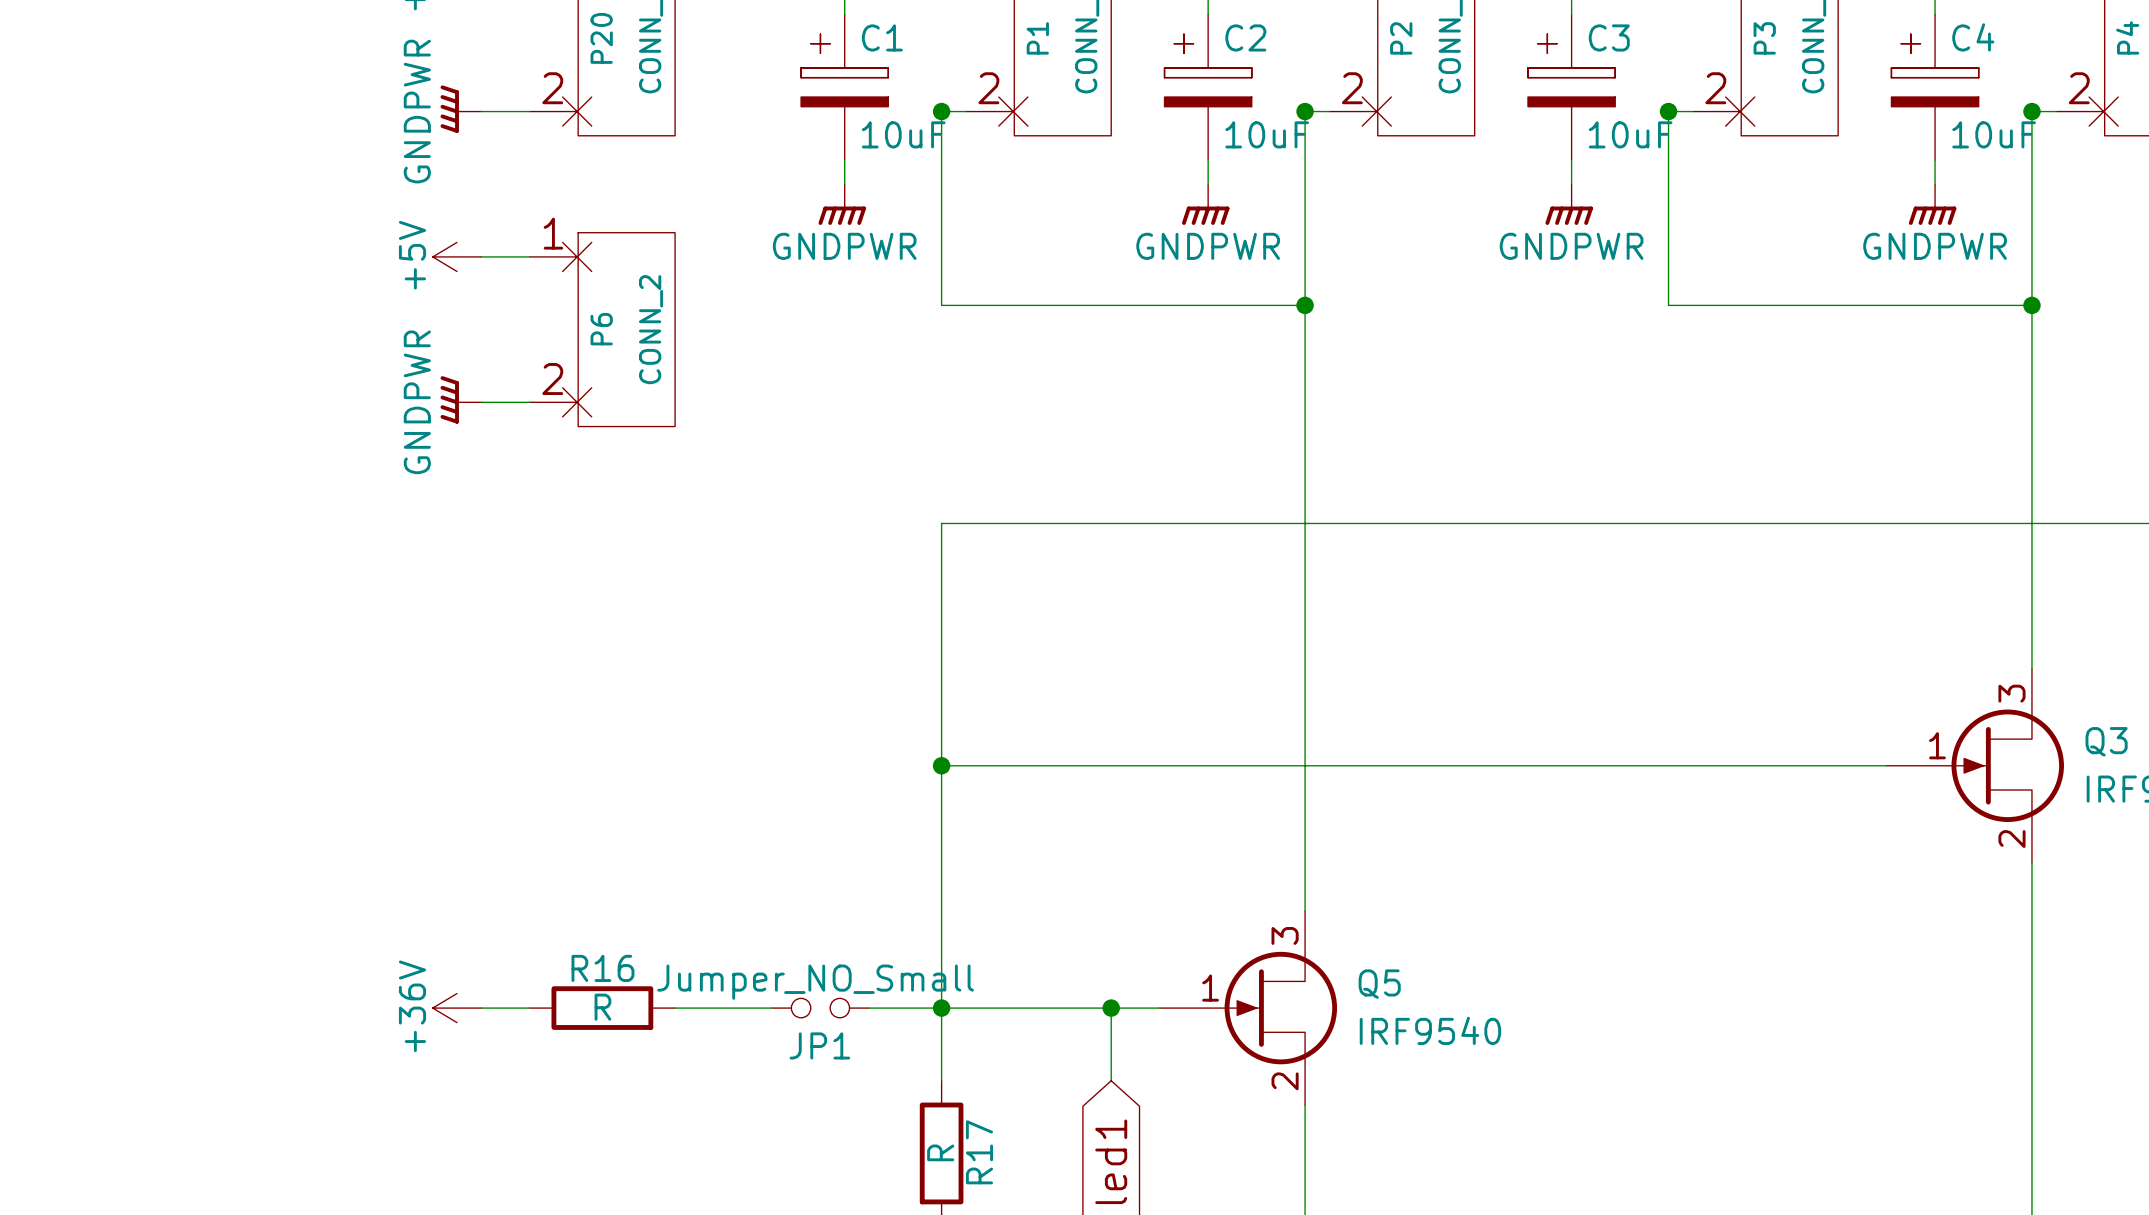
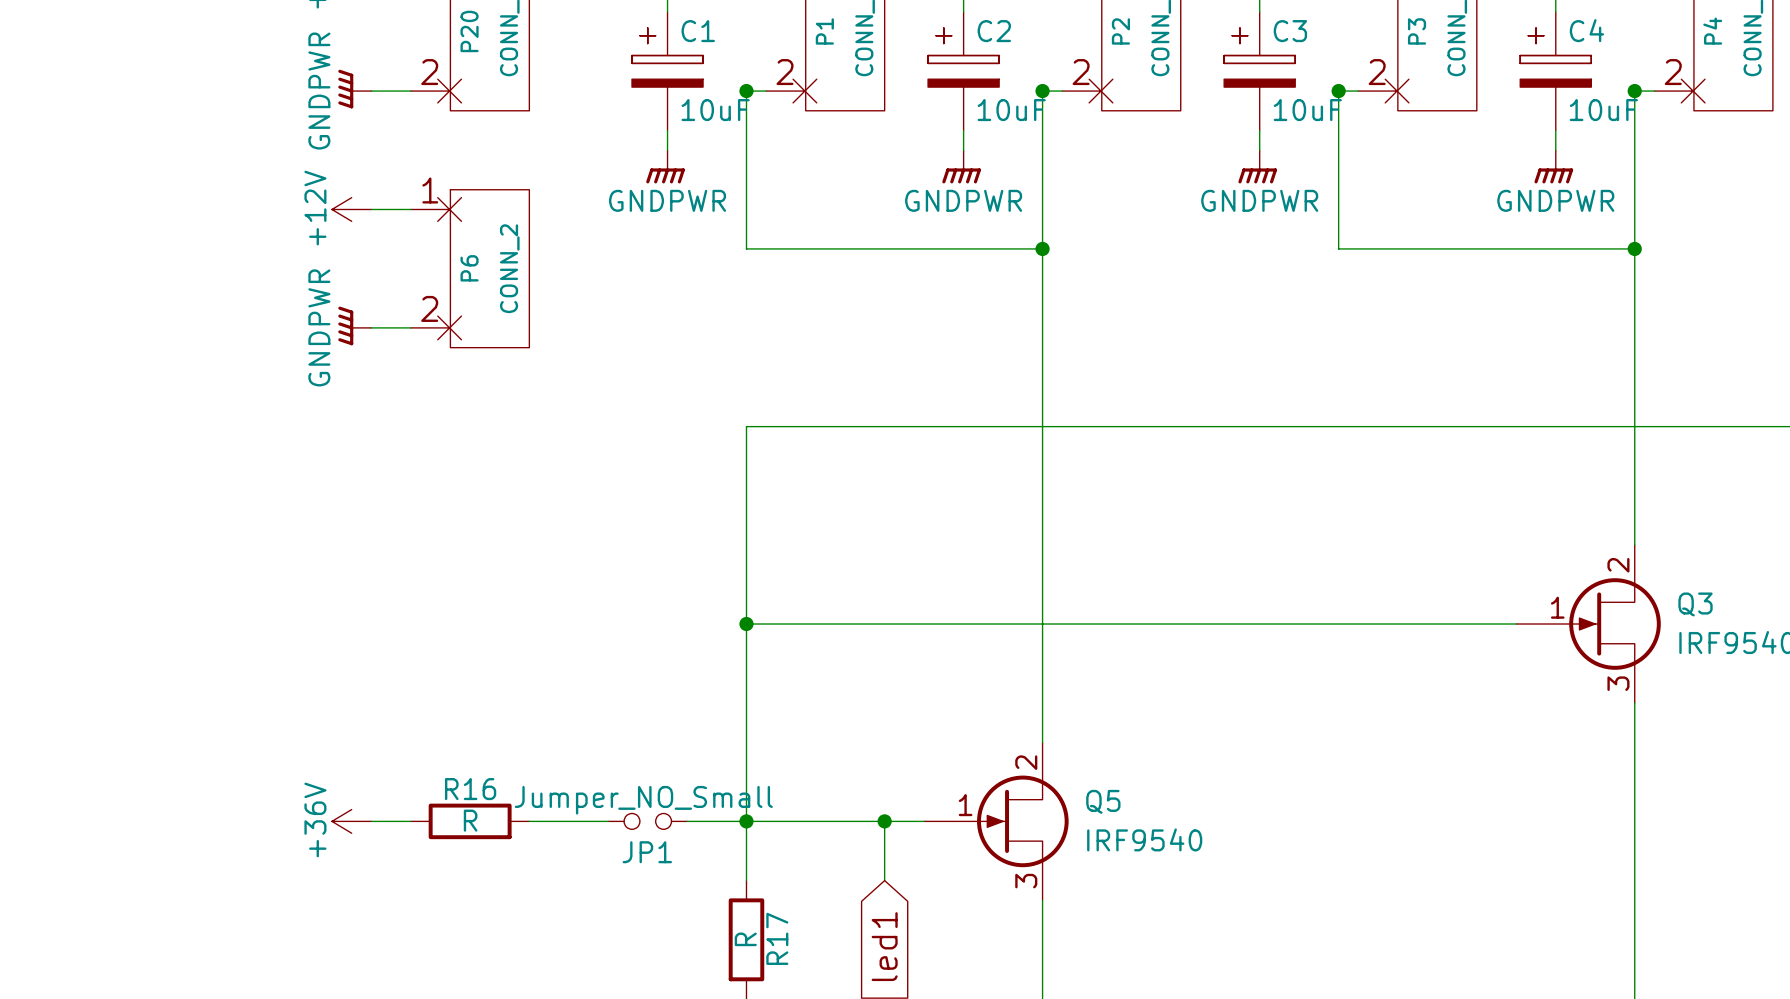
power symbol: +5V (457, 256) -> +12V (351, 209)
Q3 pin number: 3 (2011, 693) -> 2 (1618, 565)
Q3 pin number: 2 (2011, 839) -> 3 (1618, 683)
Q5 pin number: 3 (1285, 935) -> 2 (1026, 762)
Q5 pin number: 2 (1285, 1081) -> 3 (1026, 881)

